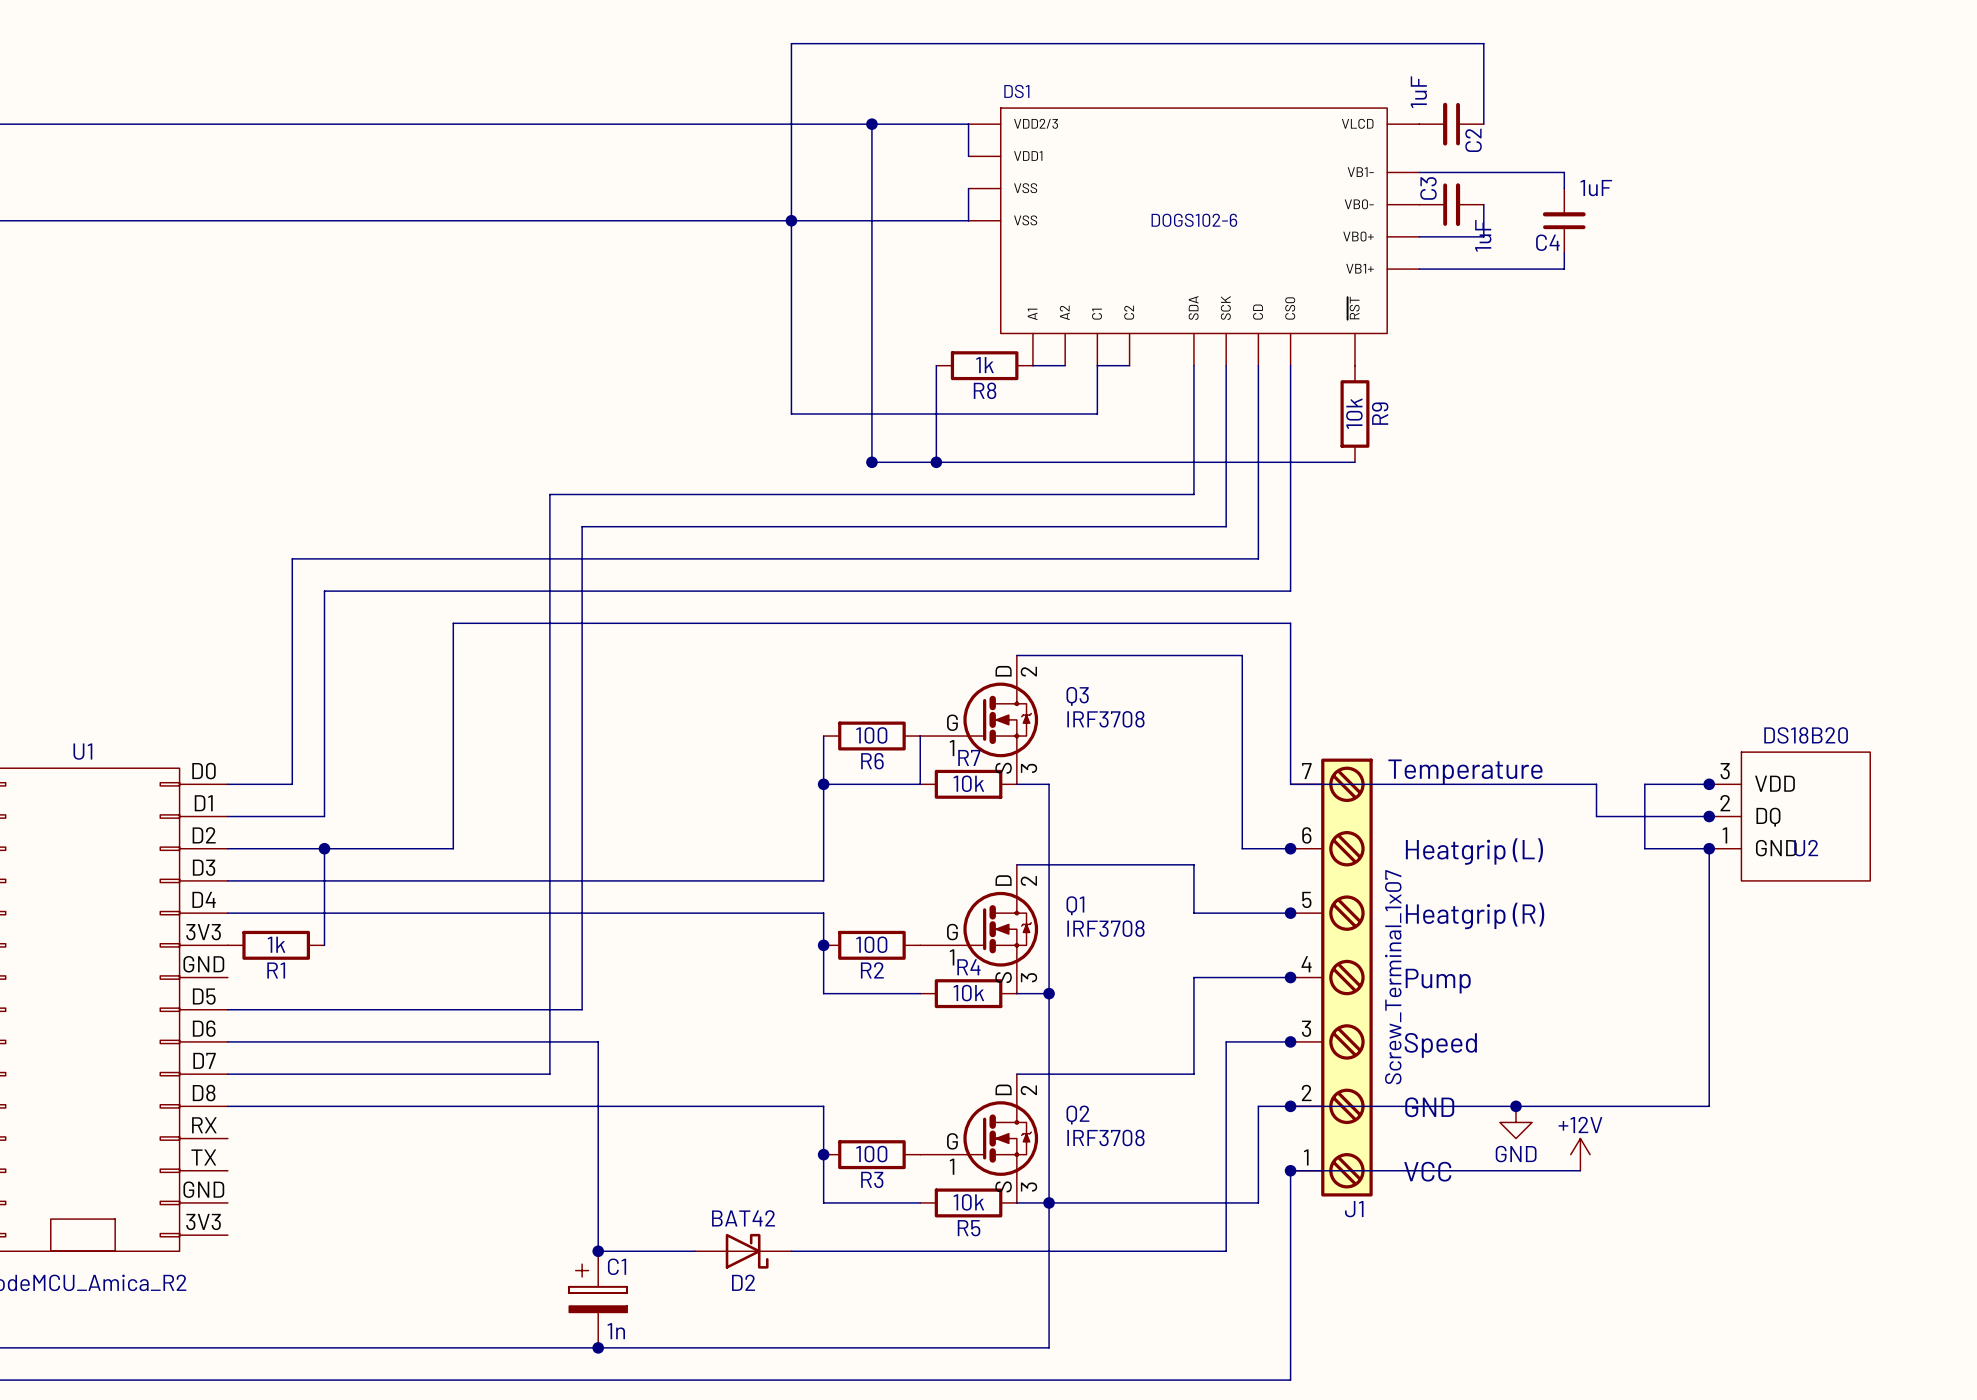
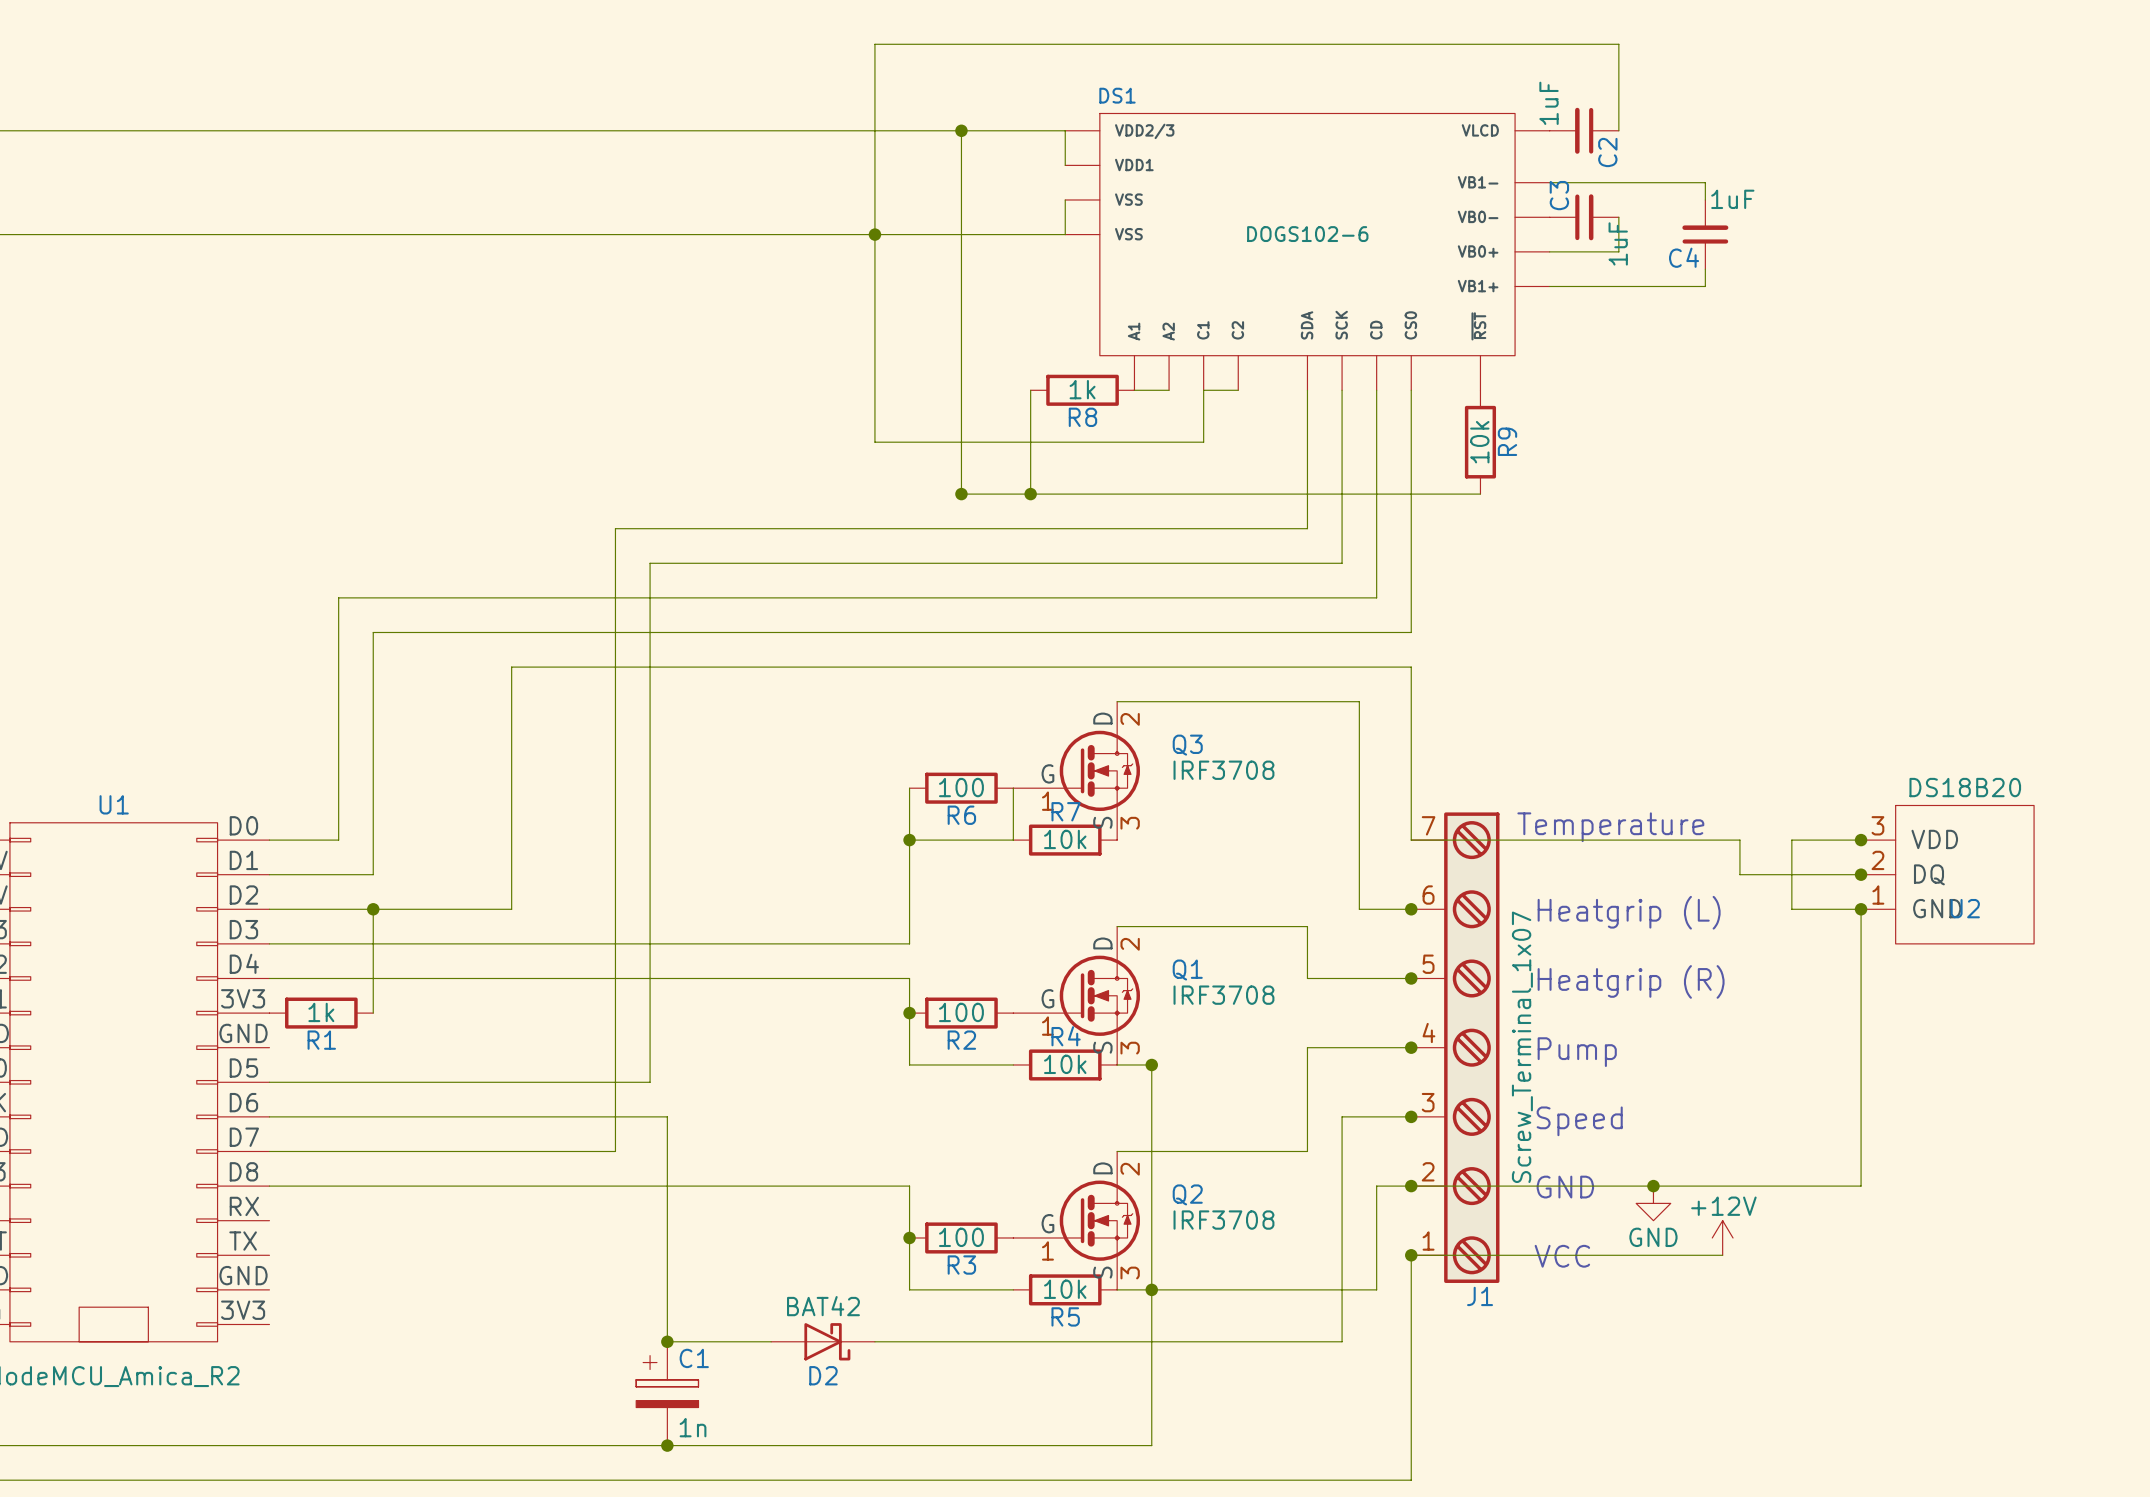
wire: (1016, 784) (1049, 784) (1049, 993) -> none

